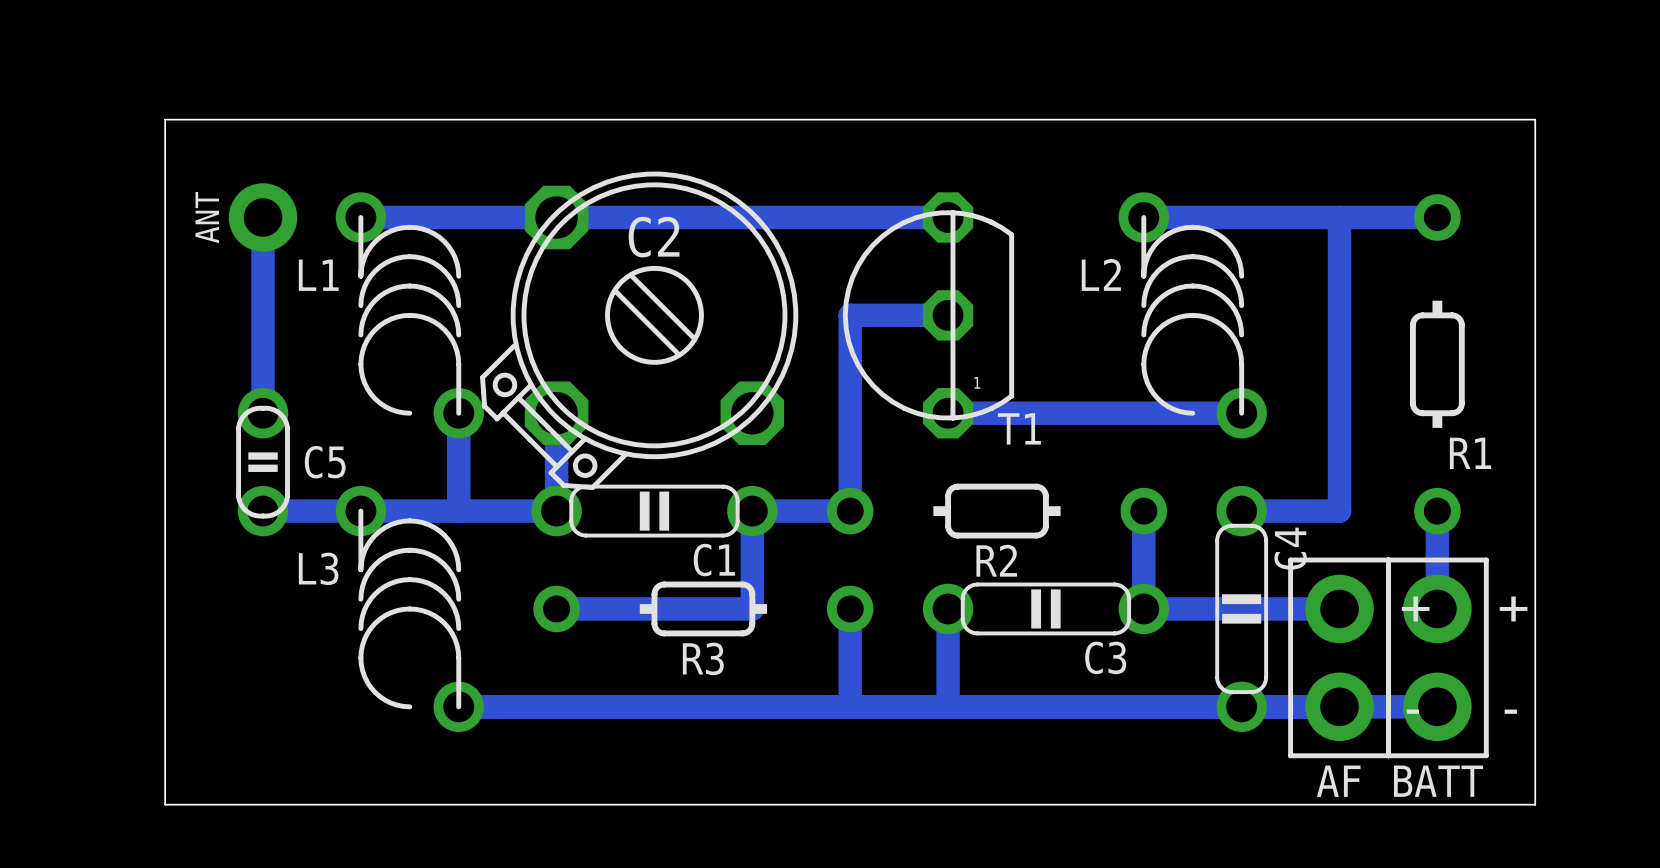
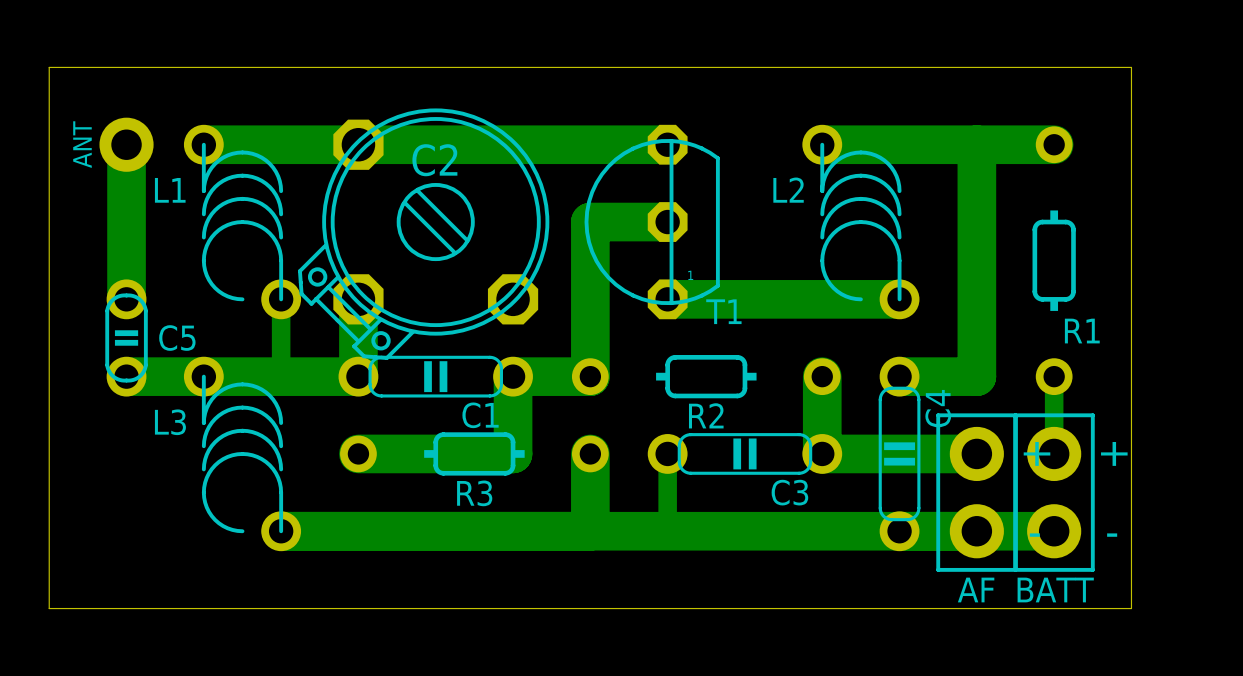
bottom track width: thin (263, 217) (263, 413) -> thick (126, 144) (126, 299)
bottom track width: thin (360, 217) (948, 217) -> thick (203, 144) (667, 144)
bottom track width: thin (1143, 217) (1437, 217) -> thick (822, 144) (1054, 144)
bottom track width: thin (1339, 217) (1339, 511) (1241, 511) -> thick (976, 144) (976, 376) (899, 376)
bottom track width: thin (948, 315) (850, 315) (850, 511) (752, 511) (752, 608) (556, 608) -> thick (667, 222) (590, 222) (590, 376) (513, 376) (513, 453) (358, 453)
bottom track width: thin (556, 413) (556, 511) (263, 511) -> thick (358, 299) (358, 376) (126, 376)
bottom track width: thin (948, 413) (1241, 413) -> thick (667, 299) (899, 299)
bottom track width: thin (1143, 511) (1143, 608) (1339, 608) -> thick (822, 376) (822, 453) (976, 453)
bottom track width: thin (850, 608) (850, 706) -> thick (590, 453) (590, 531)
bottom track width: thin (458, 706) (1437, 706) -> thick (281, 531) (1054, 531)

